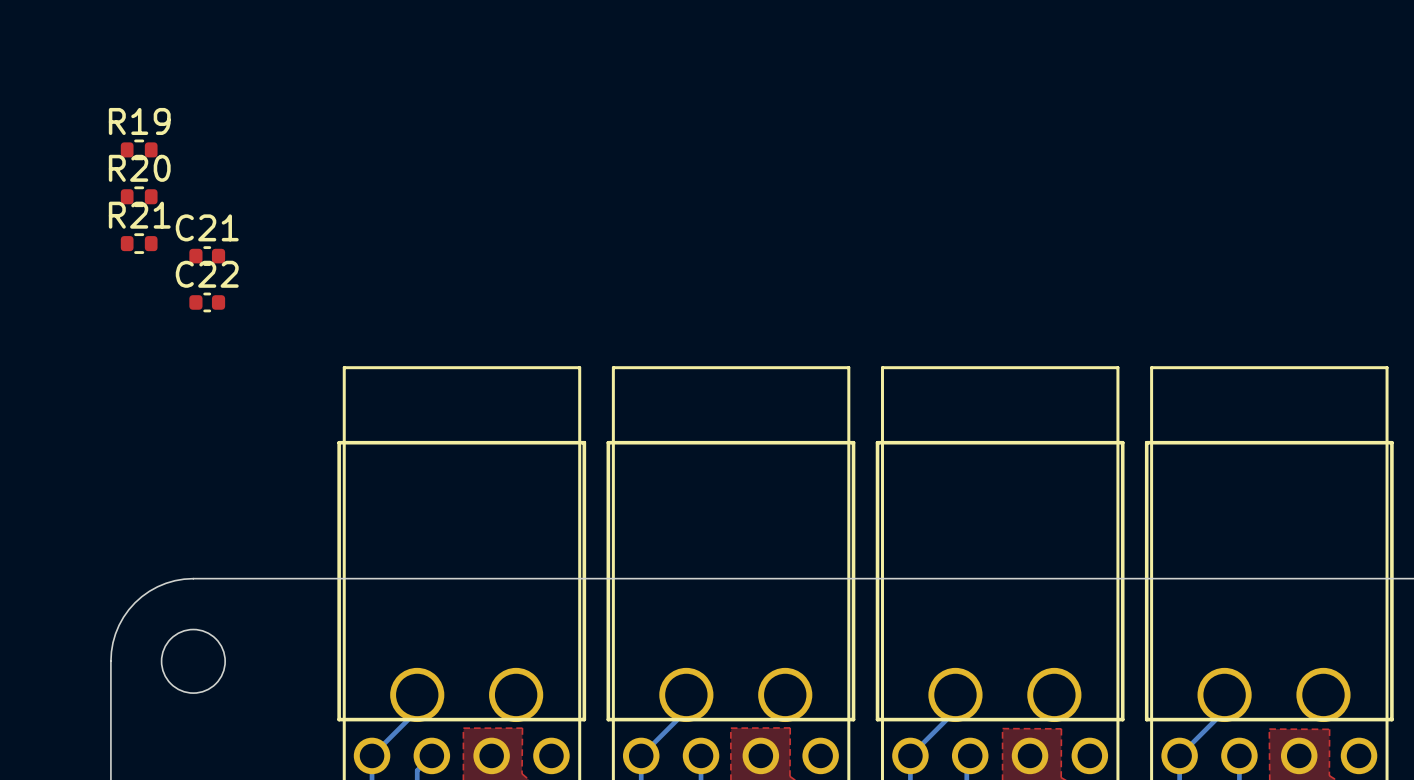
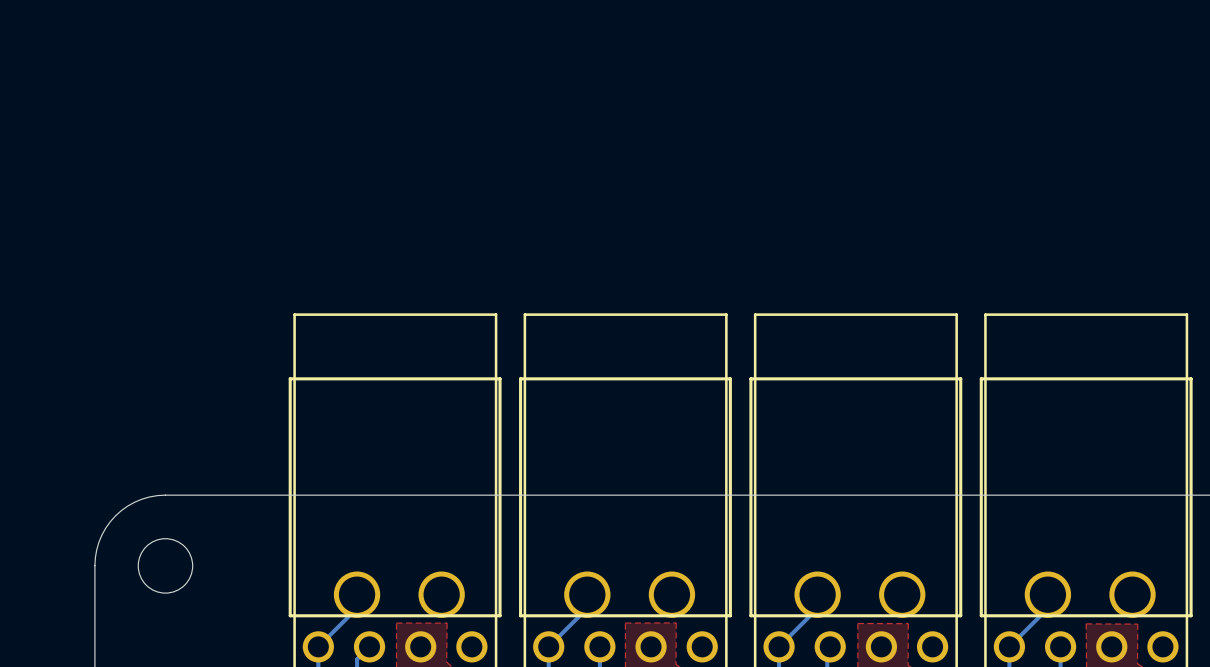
R19: (139, 149) -> none
R20: (139, 196) -> none
R21: (139, 243) -> none
C21: (207, 256) -> none
C22: (207, 302) -> none

